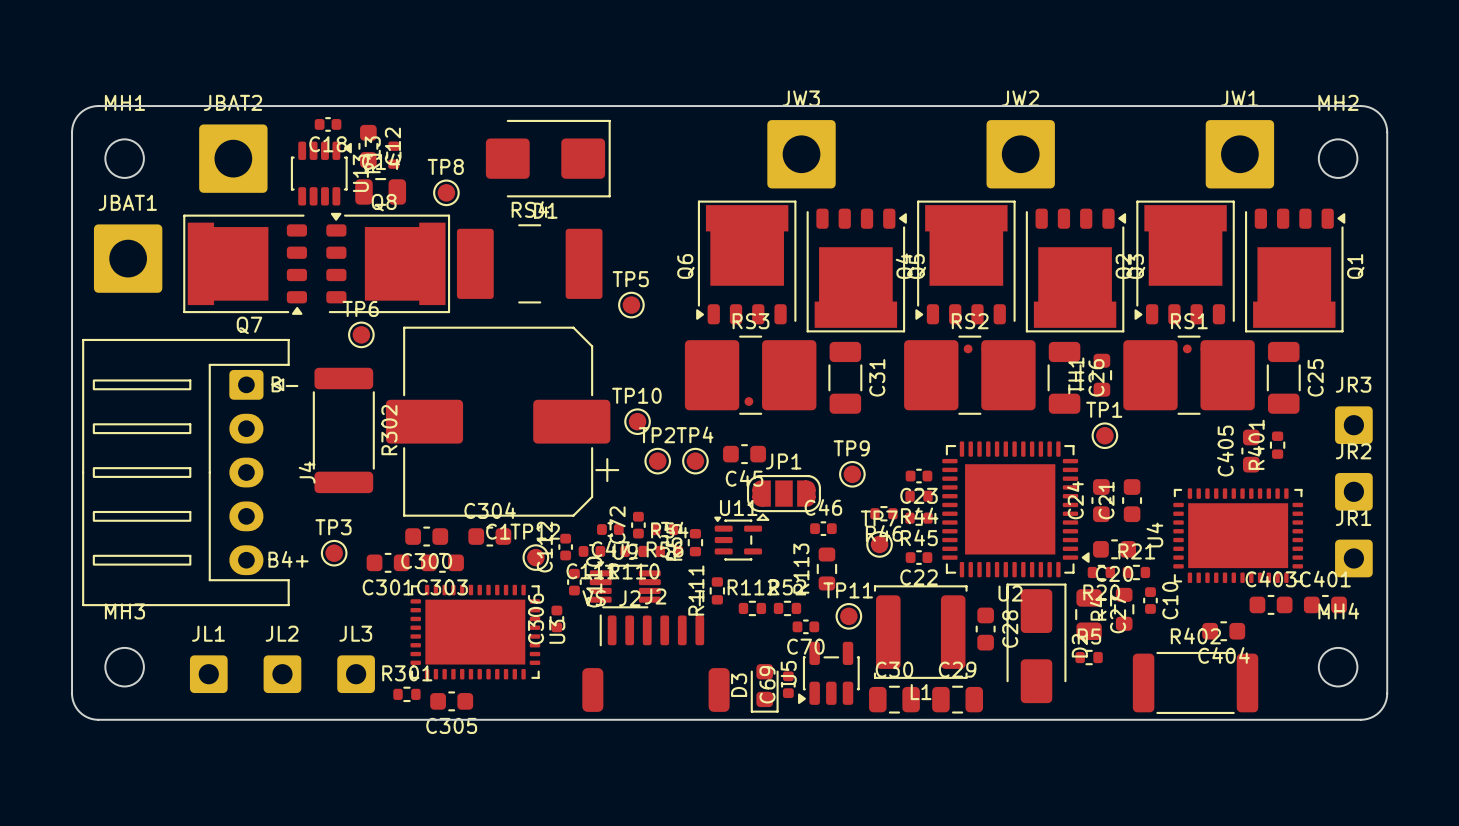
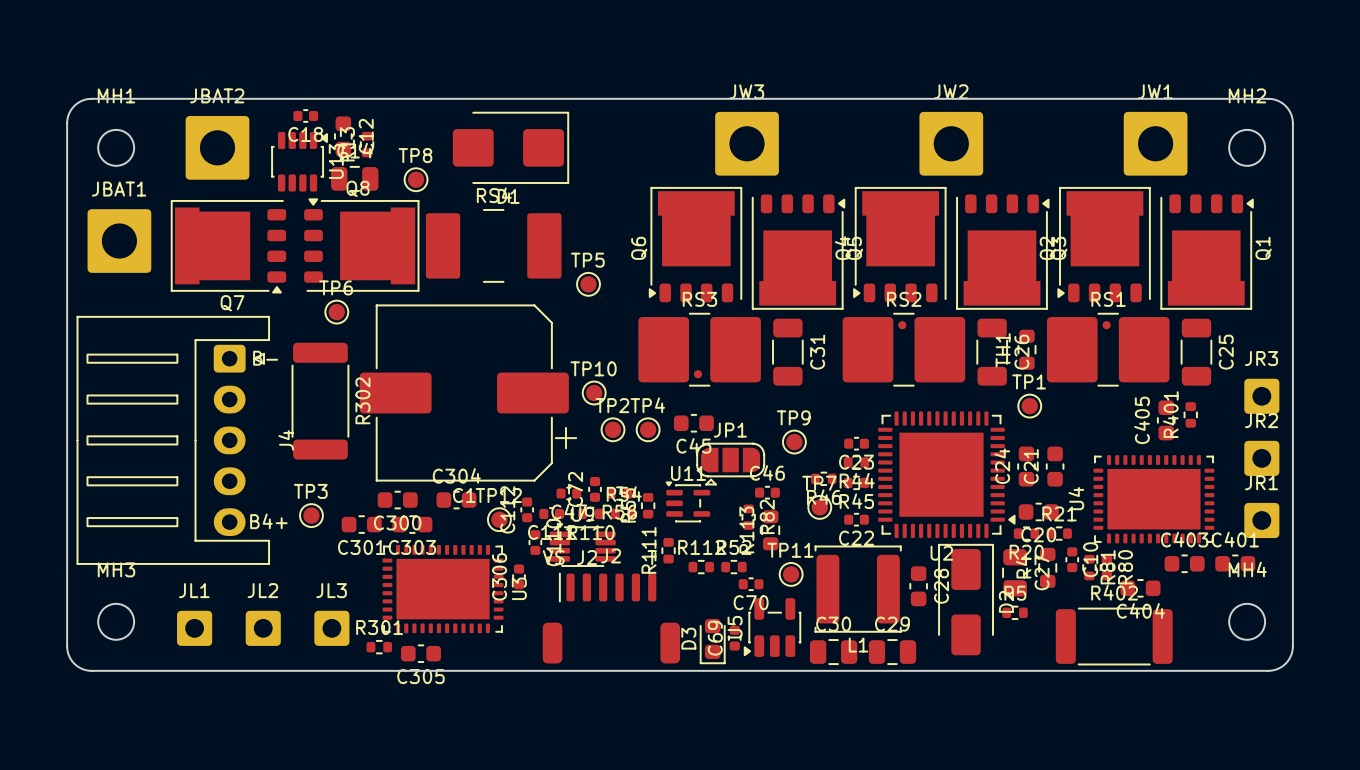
R82: none -> (748, 517)
R81: none -> (1089, 567)
R80: none -> (1106, 567)

